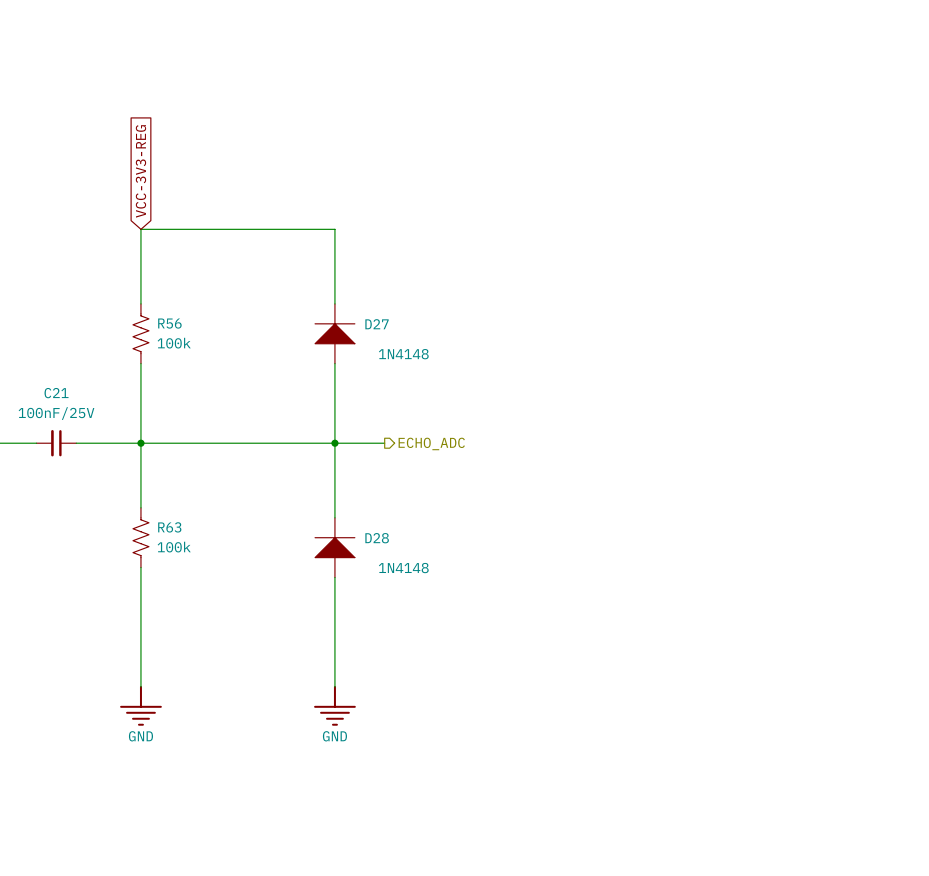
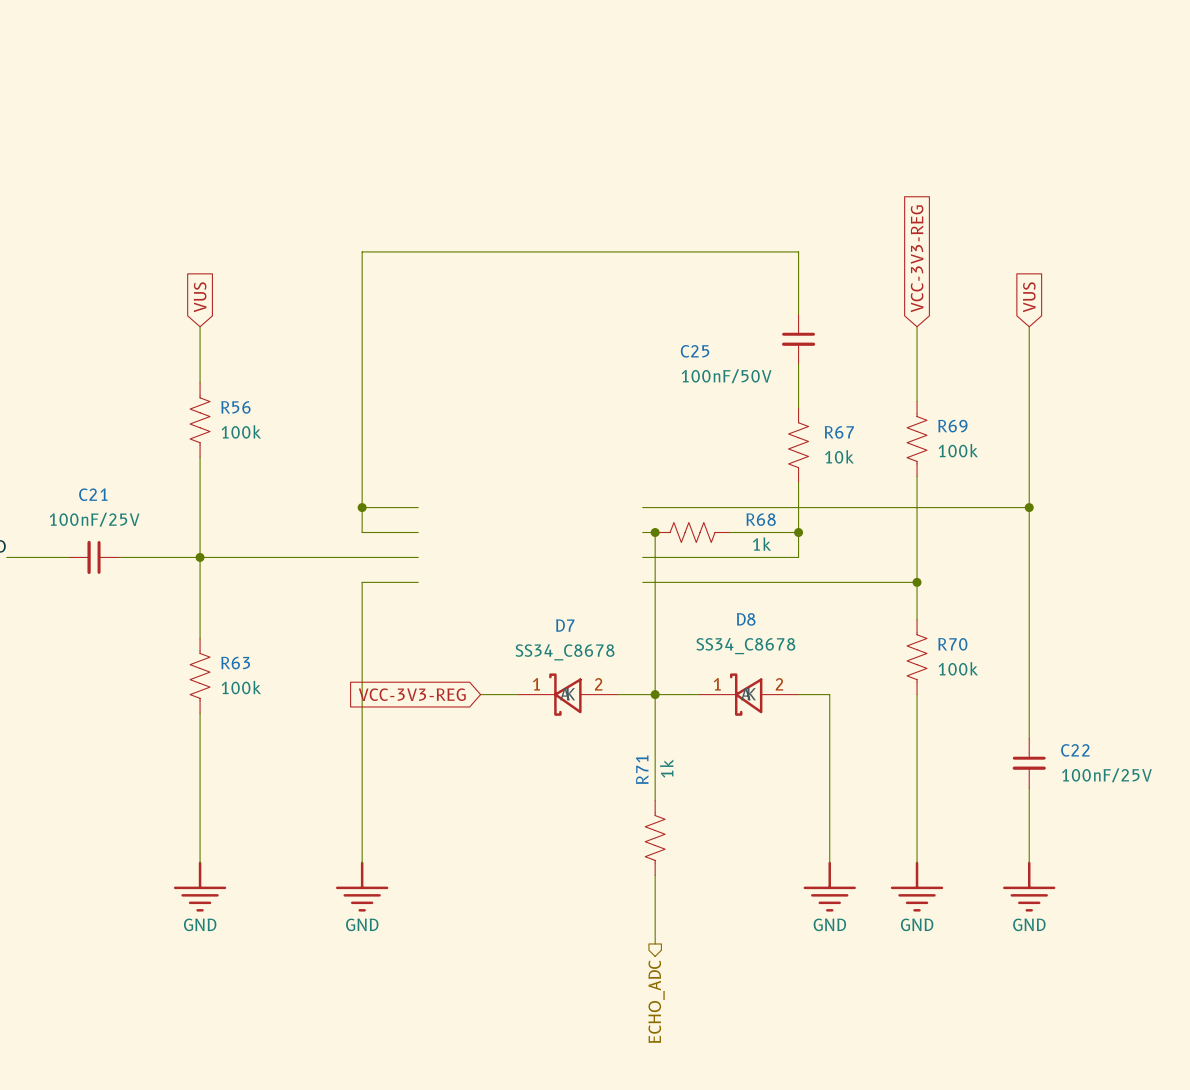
global label: VCC-3V3-REG (140, 171) -> none
global label: none -> VCC-3V3-REG (917, 258)
global label: none -> VUS (200, 297)
global label: none -> VUS (1029, 297)
wire: none -> (798, 314) (798, 251) (362, 251) (362, 532) (418, 532)
wire: (140, 259) (140, 229) (334, 229) (334, 303) -> none
wire: none -> (917, 326) (917, 401)
wire: none -> (1029, 326) (1029, 738)
C25: none -> 100nF/50V (798, 339)
wire: none -> (798, 364) (798, 407)
D27: 1N4148 (334, 333) -> none
R69: none -> 100k (917, 438)
R67: none -> 10k (798, 445)
wire: (334, 363) (334, 517) -> none
wire: none -> (917, 476) (917, 619)
wire: none -> (798, 482) (798, 557) (642, 557)
wire: none -> (362, 507) (418, 507)
junction: none -> (362, 507)
wire: none -> (642, 507) (1029, 507)
junction: none -> (1029, 507)
wire: none -> (642, 532) (655, 532) (655, 800)
junction: none -> (655, 532)
R68: none -> 1k (692, 532)
wire: none -> (729, 532) (798, 532)
junction: none -> (798, 532)
wire: (315, 443) (384, 443) -> none
junction: (334, 443) -> none
hierarchical label: ECHO_ADC (431, 443) -> none
wire: none -> (418, 582) (362, 582) (362, 862)
wire: none -> (642, 582) (917, 582)
junction: none -> (917, 582)
R70: none -> 100k (917, 657)
D28: 1N4148 (334, 547) -> none
global label: none -> VCC-3V3-REG (412, 694)
wire: none -> (480, 694) (518, 694)
D7: none -> SS34_C8678 (567, 694)
wire: none -> (617, 694) (698, 694)
junction: none -> (655, 694)
D8: none -> SS34_C8678 (748, 694)
wire: none -> (798, 694) (829, 694) (829, 862)
wire: none -> (917, 694) (917, 862)
wire: (334, 577) (334, 686) -> none
C22: none -> 100nF/25V (1029, 763)
wire: none -> (1029, 788) (1029, 862)
R71: none -> 1k (655, 837)
wire: none -> (655, 875) (655, 943)
power symbol position: GND (334, 705) -> GND (362, 886)
power symbol: none -> GND (829, 886)
power symbol: none -> GND (917, 886)
power symbol: none -> GND (1029, 886)
hierarchical label: none -> ECHO_ADC (656, 1001)

